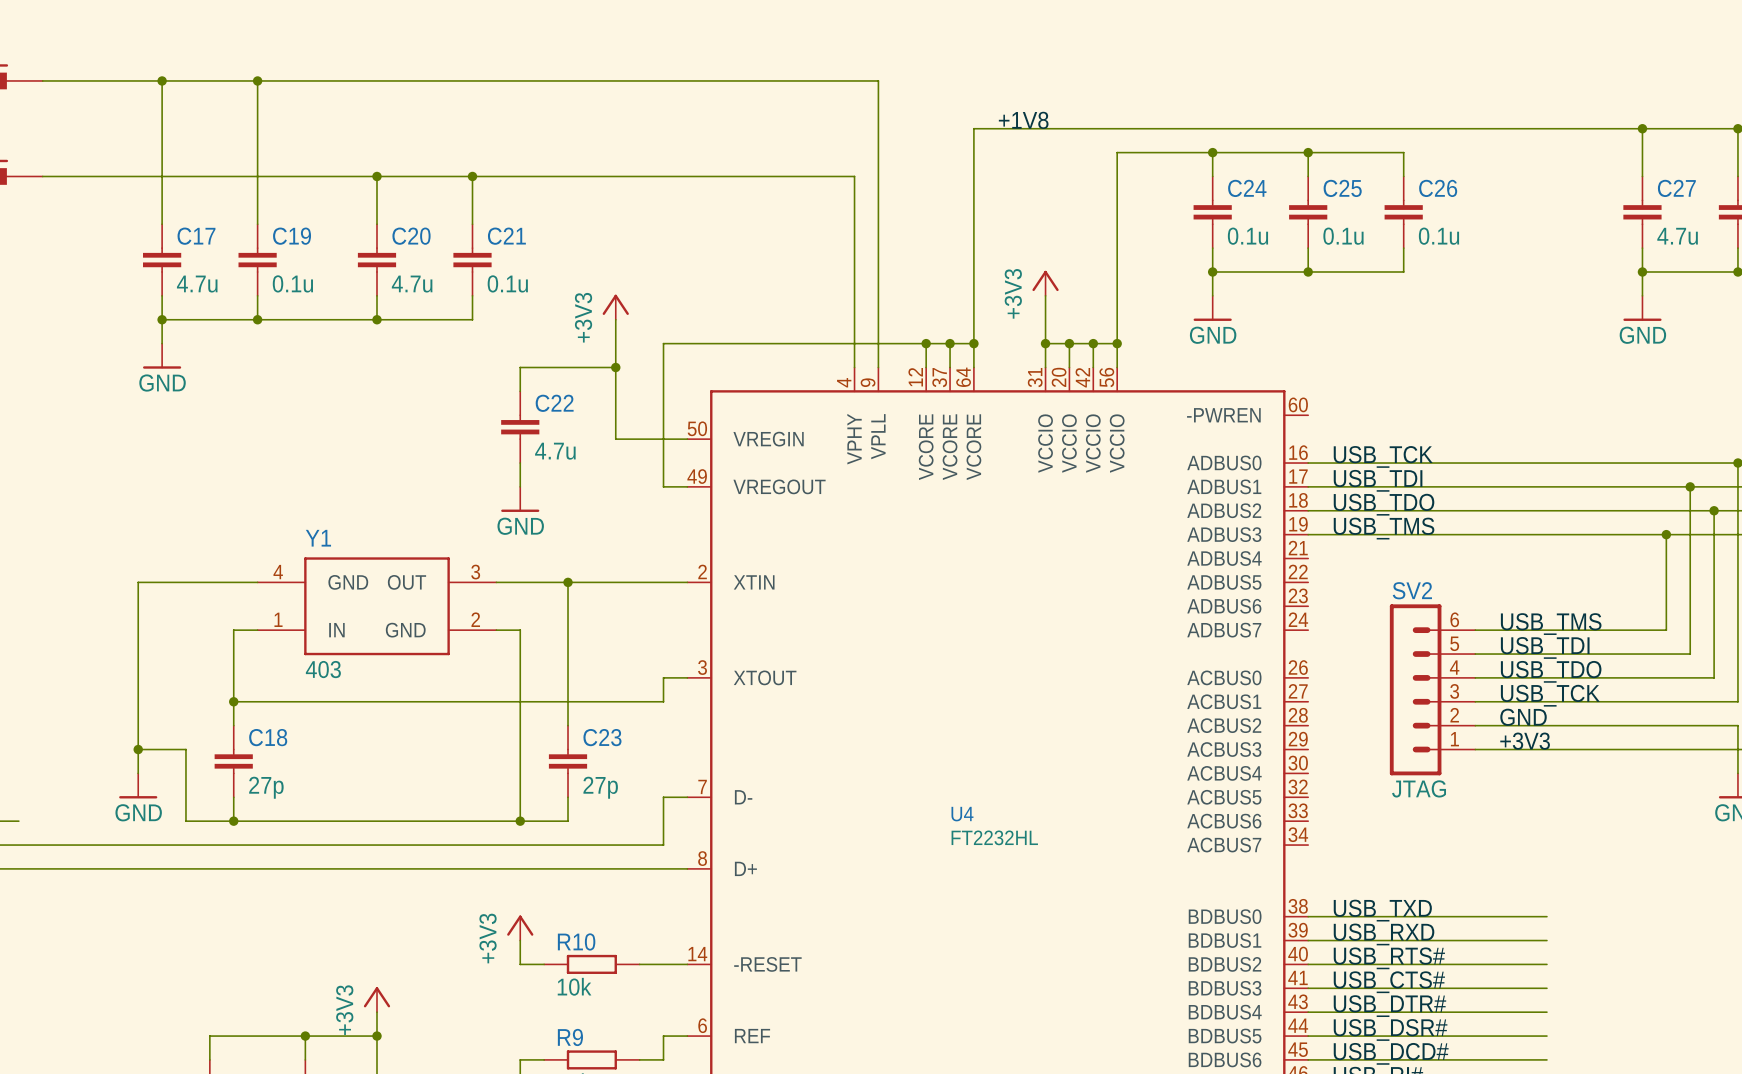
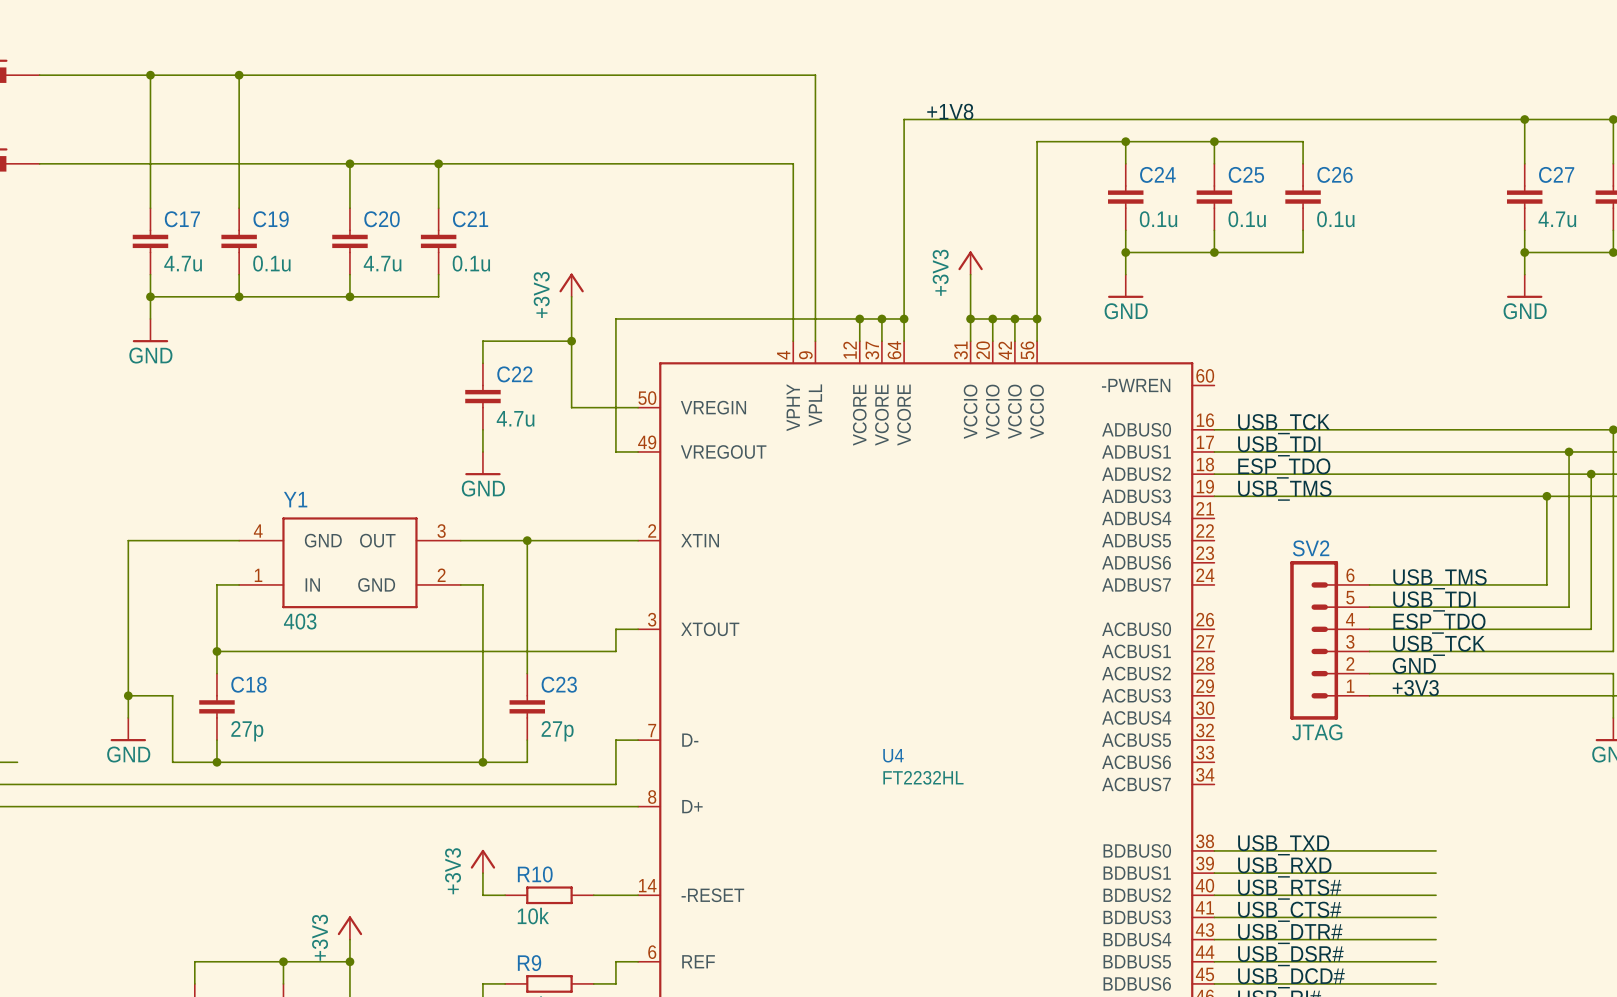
label: USB_TDO (1384, 504) -> ESP_TDO (1284, 468)
label: USB_TDO (1551, 671) -> ESP_TDO (1439, 623)

